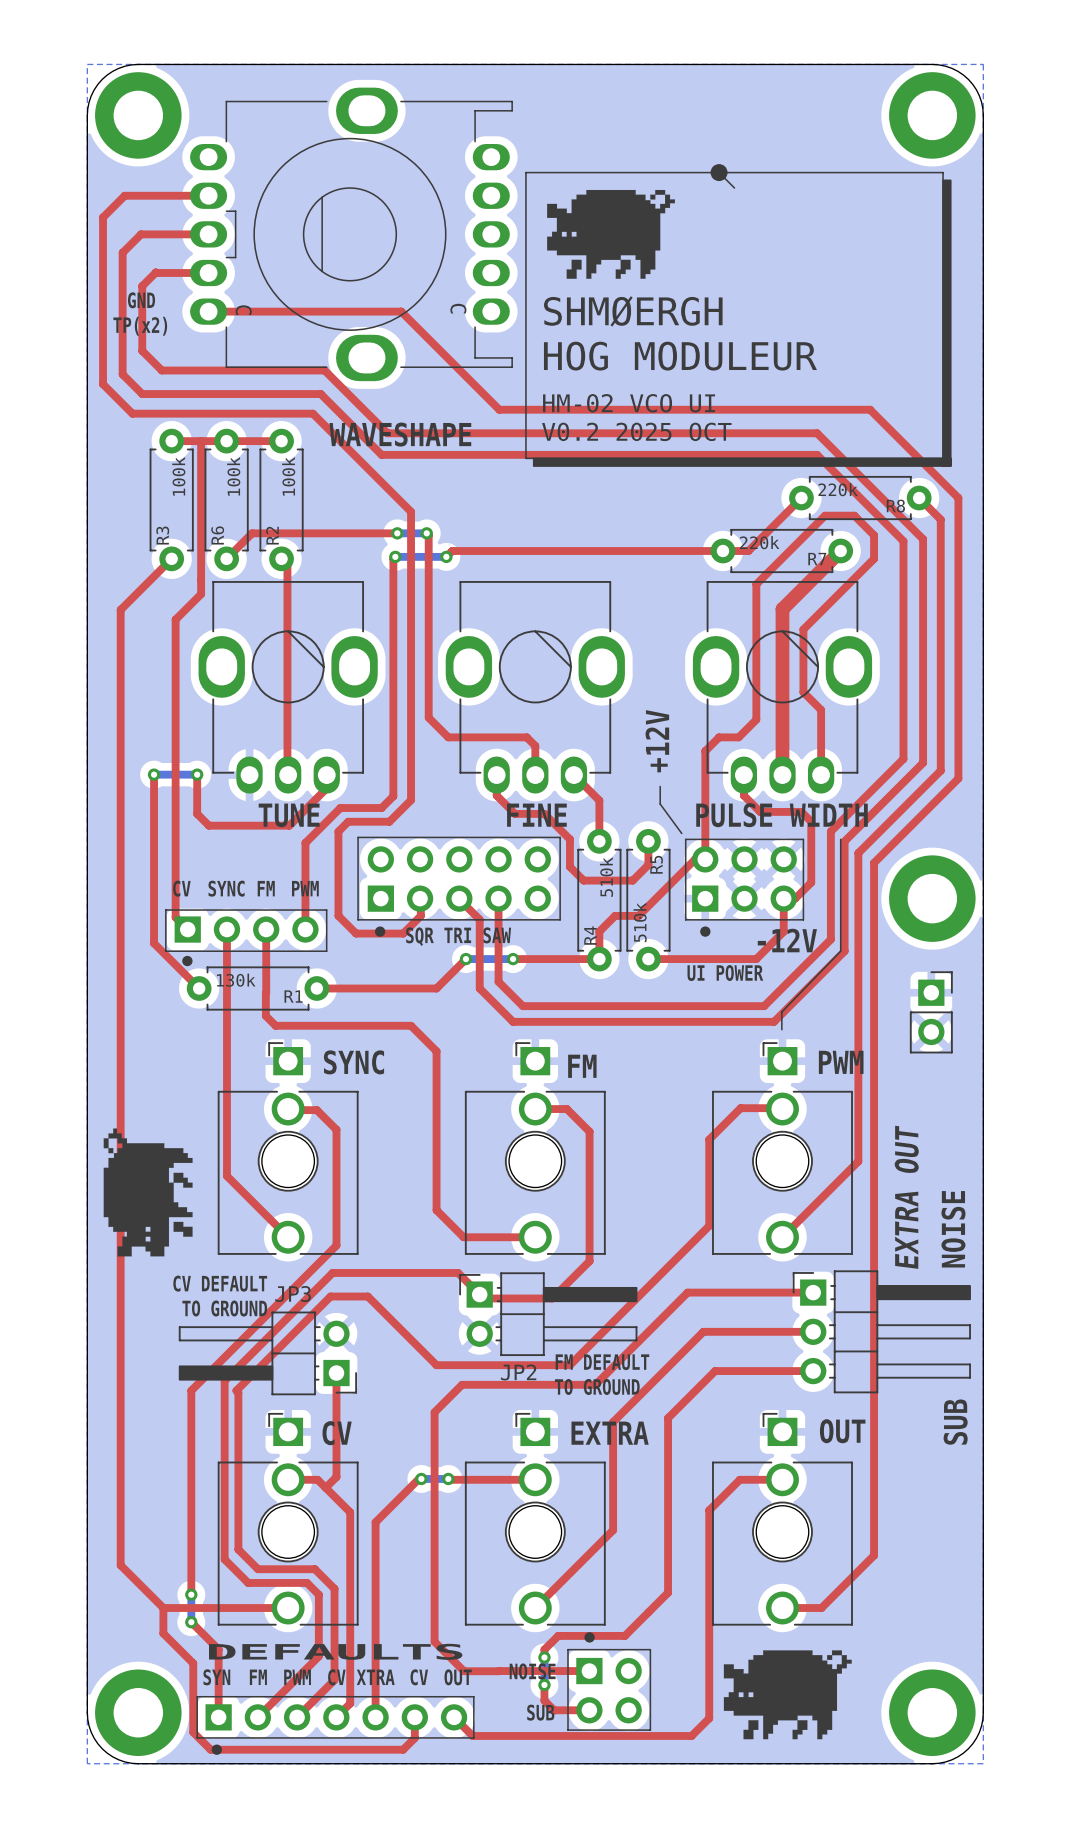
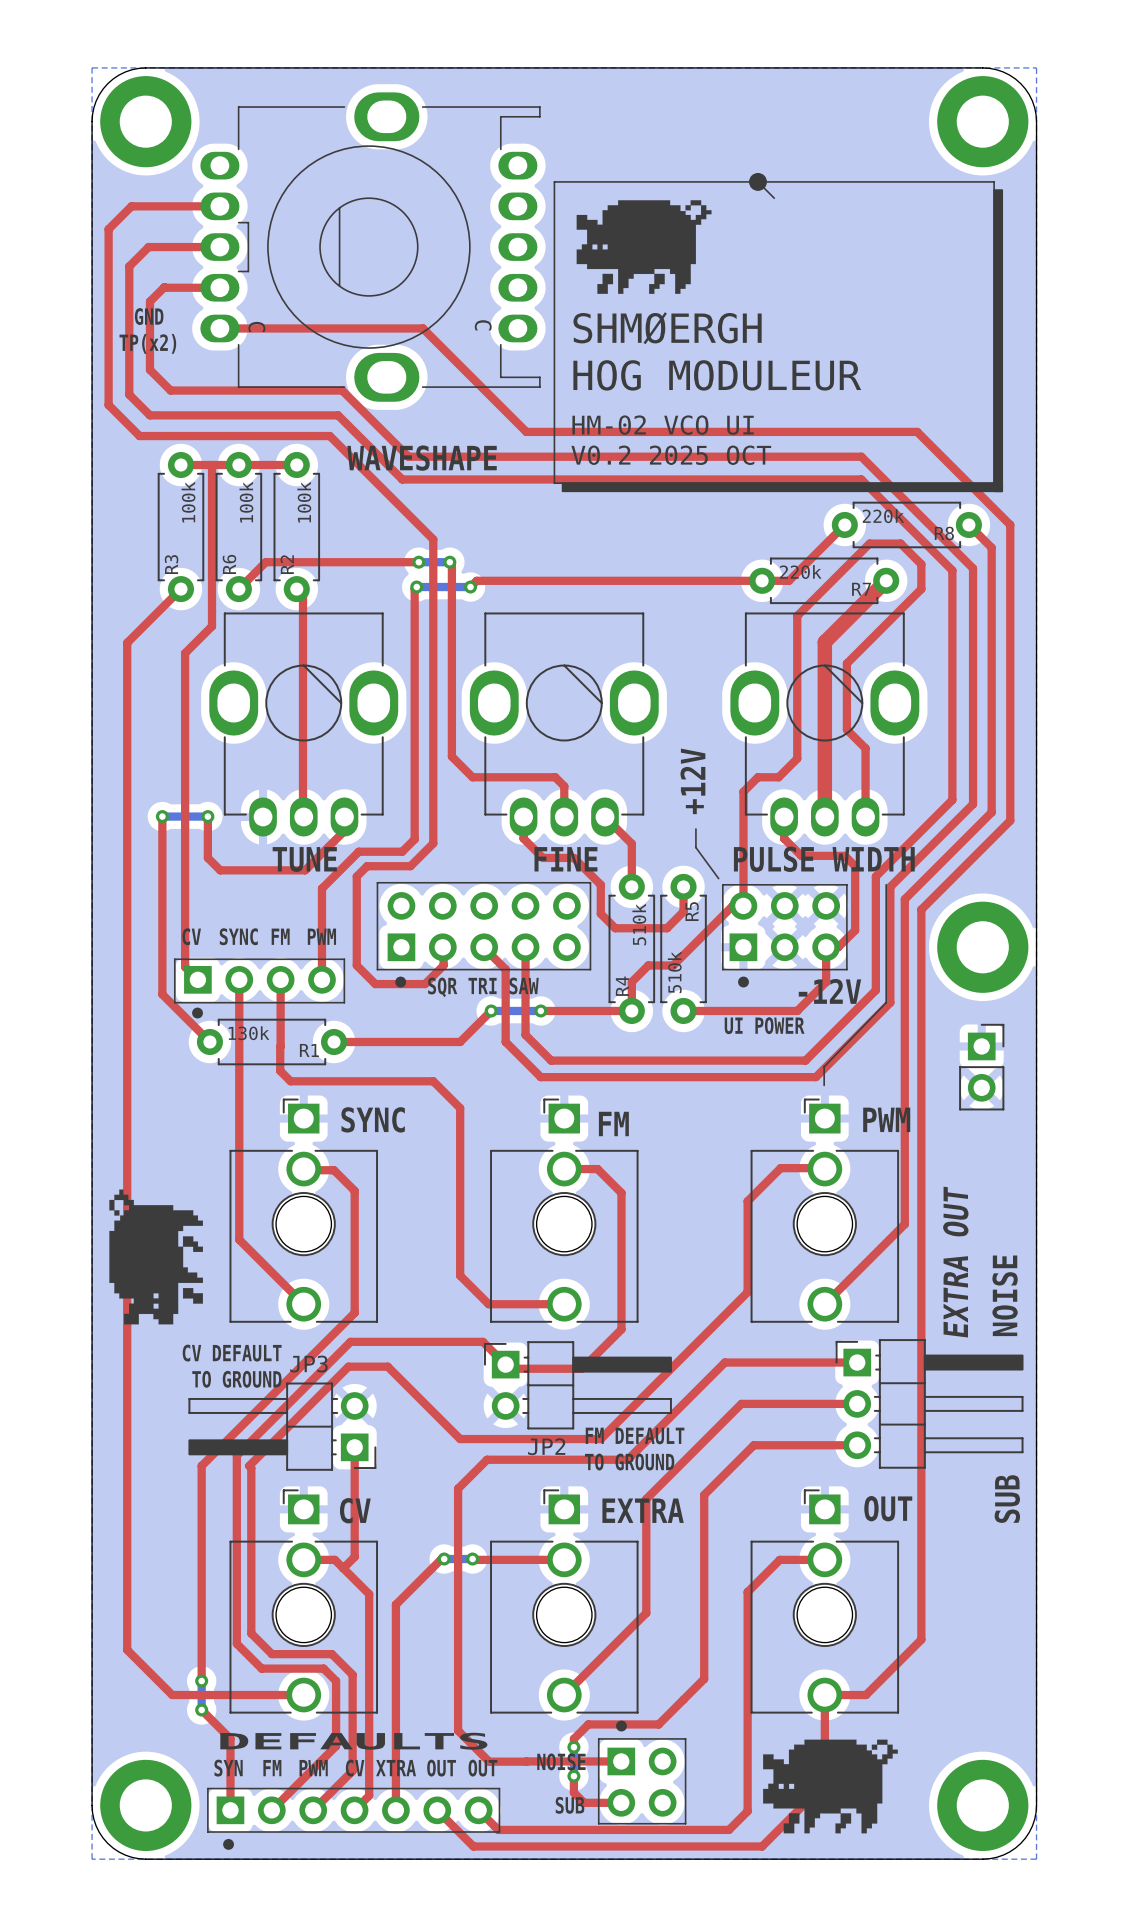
top track: (163, 1608) (163, 1633) (193, 1663) (193, 1732) (210, 1749) (403, 1749) (414, 1738) (414, 1717) -> (824, 1695) (824, 1783) (762, 1846) (473, 1846) (437, 1810)
text: CV (419, 1677) -> OUT (441, 1768)

